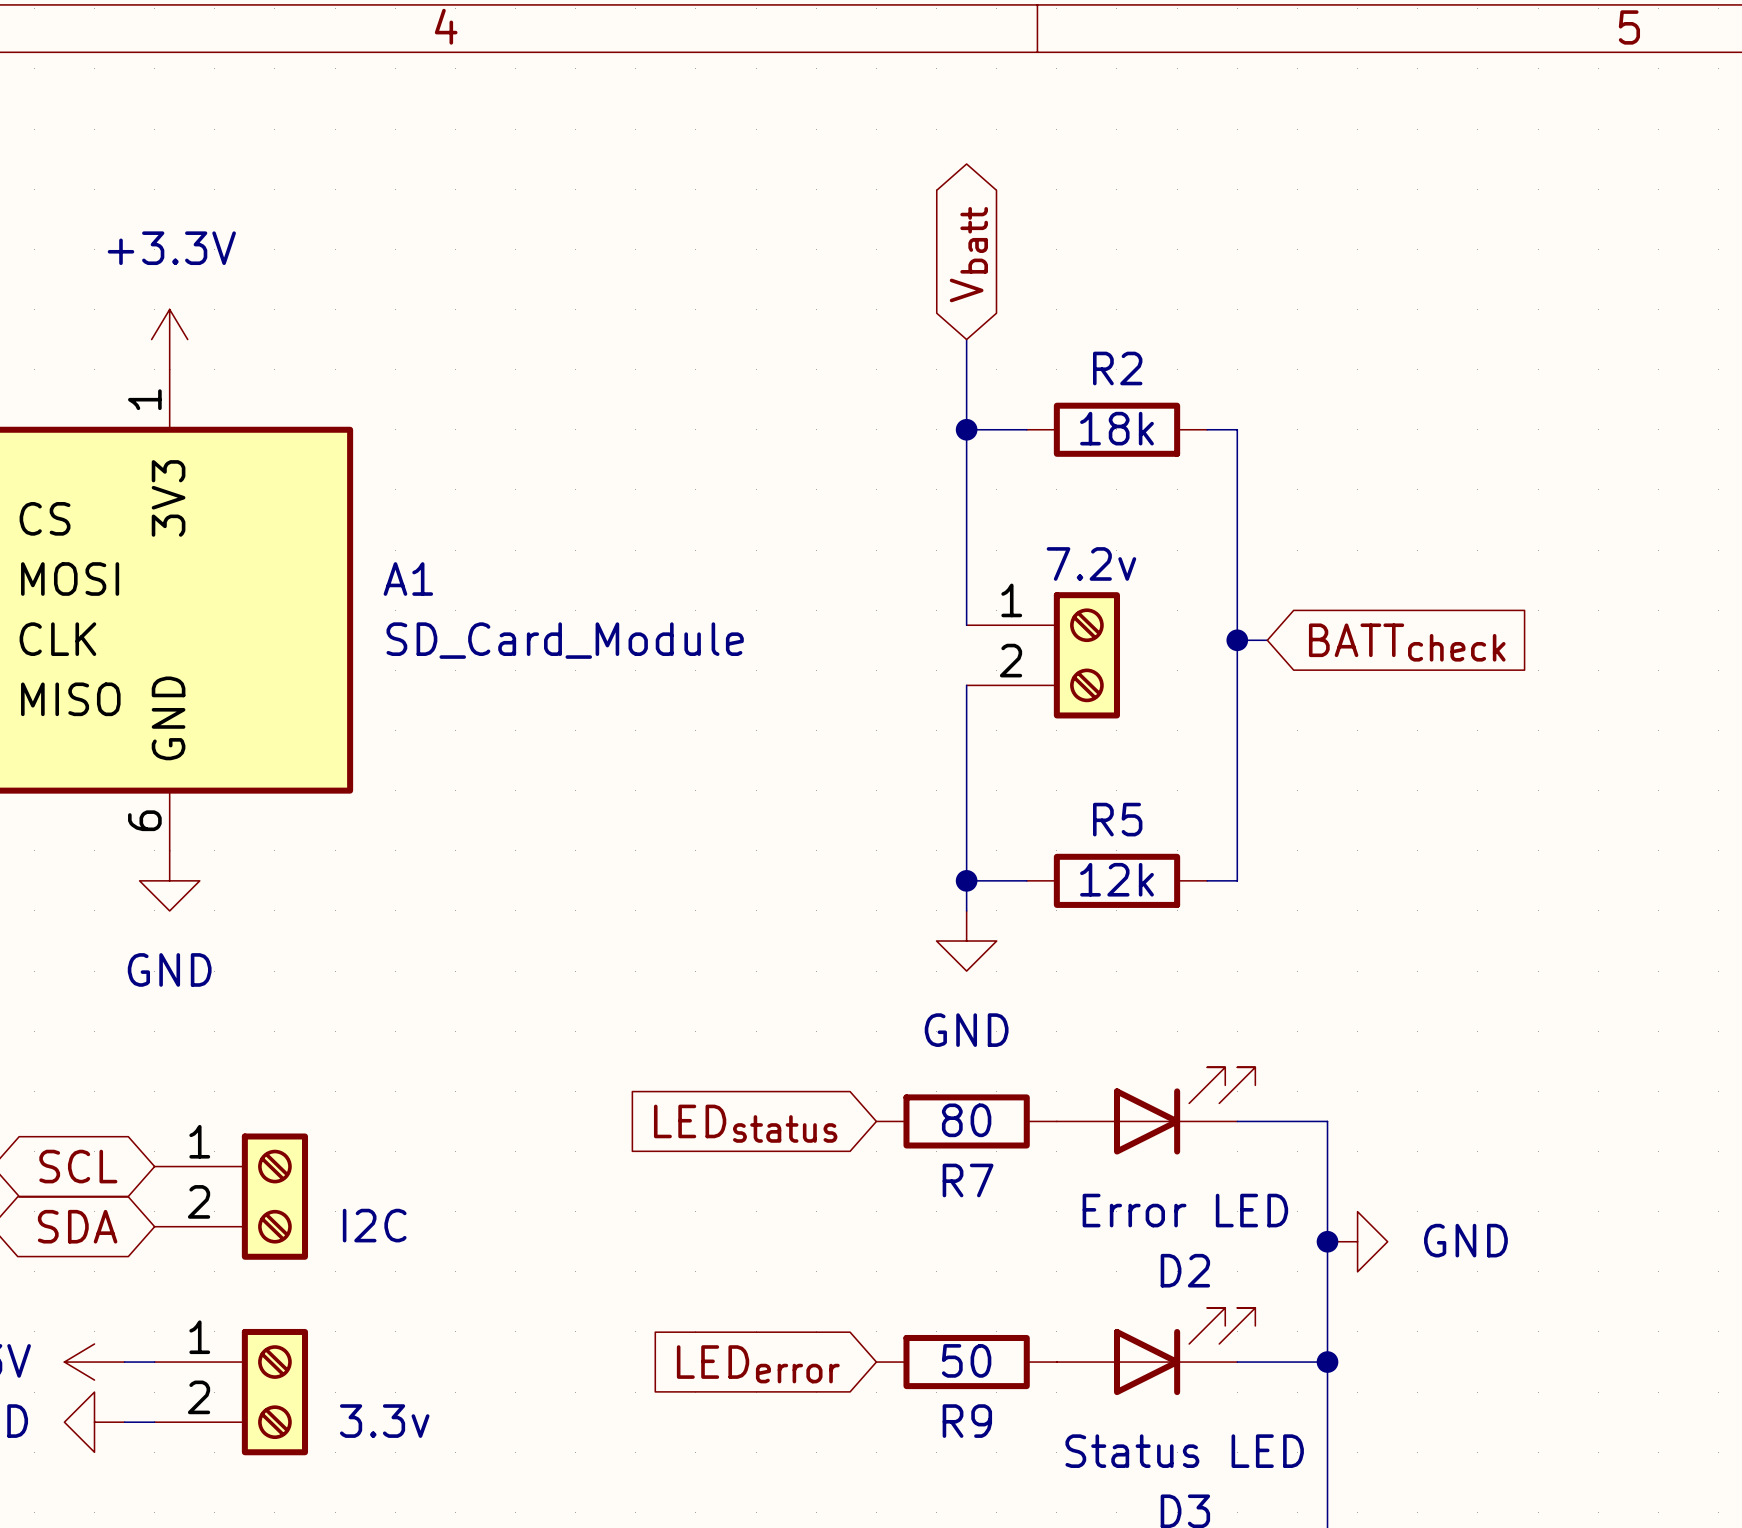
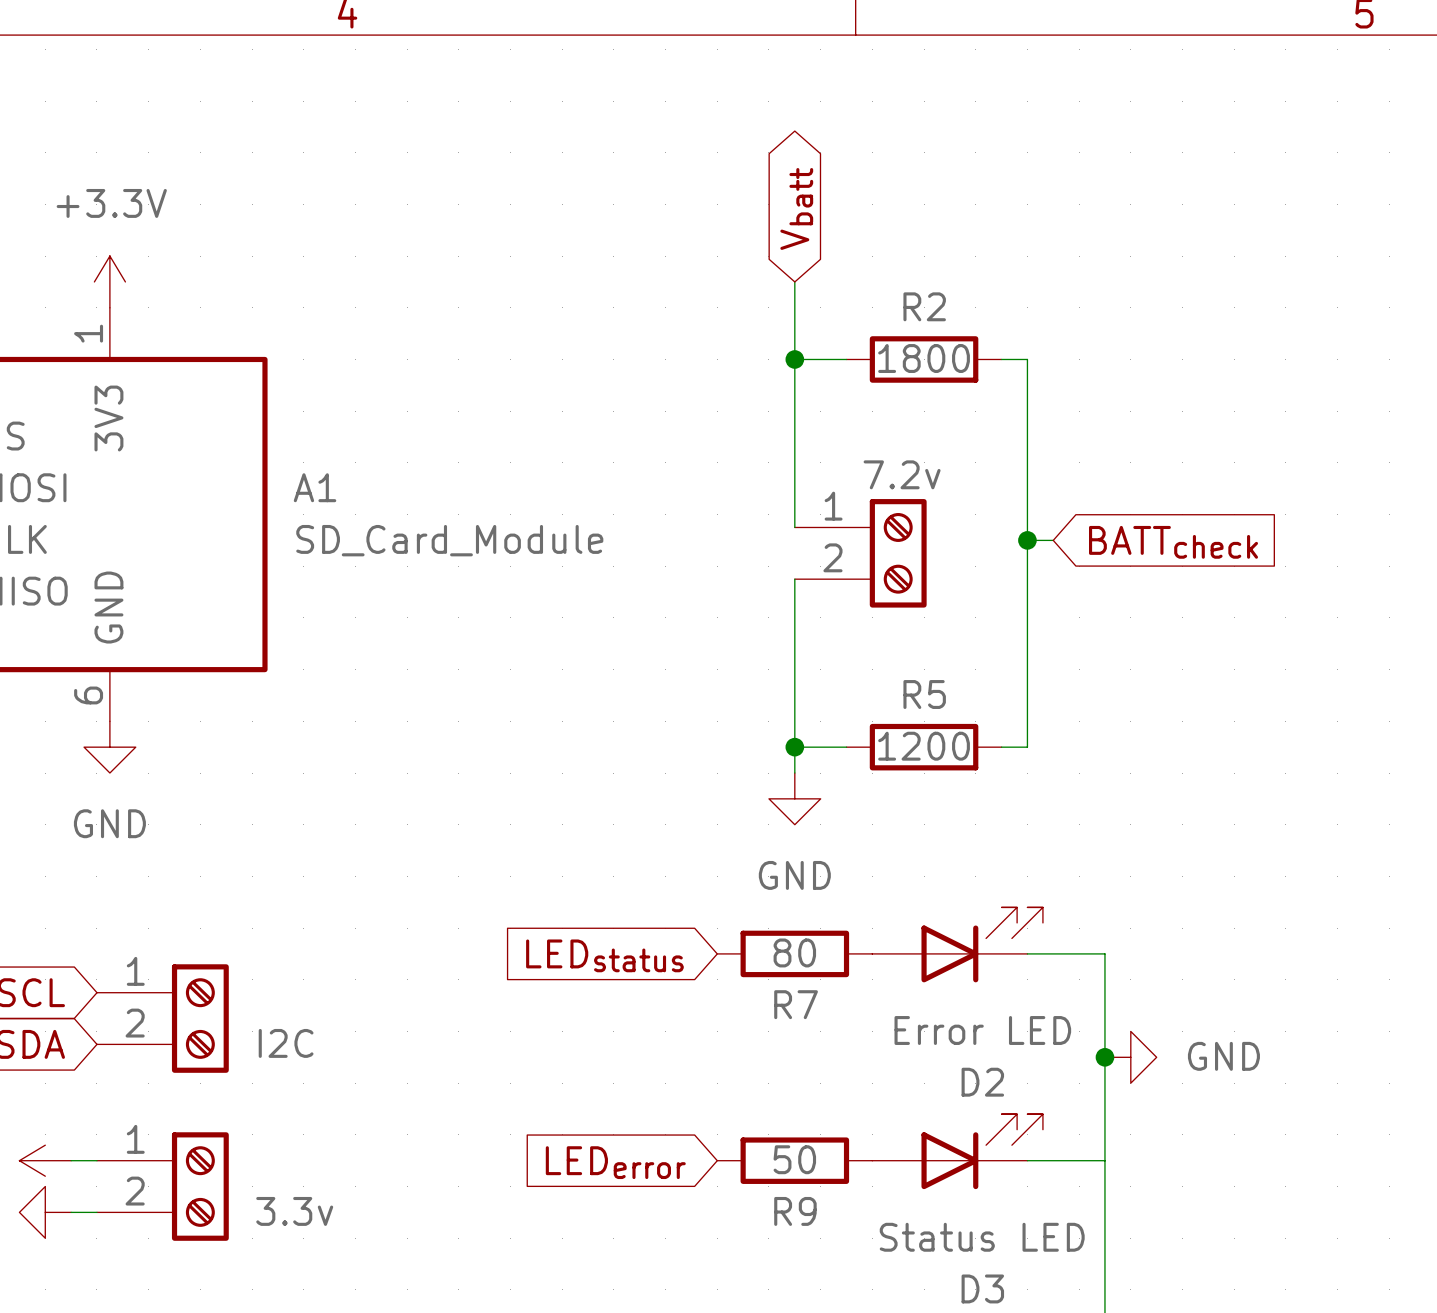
R2 value: 18k (1116, 428) -> 1800 (924, 358)
R5 value: 12k (1116, 879) -> 1200 (924, 746)
junction: (1327, 1362) -> none

